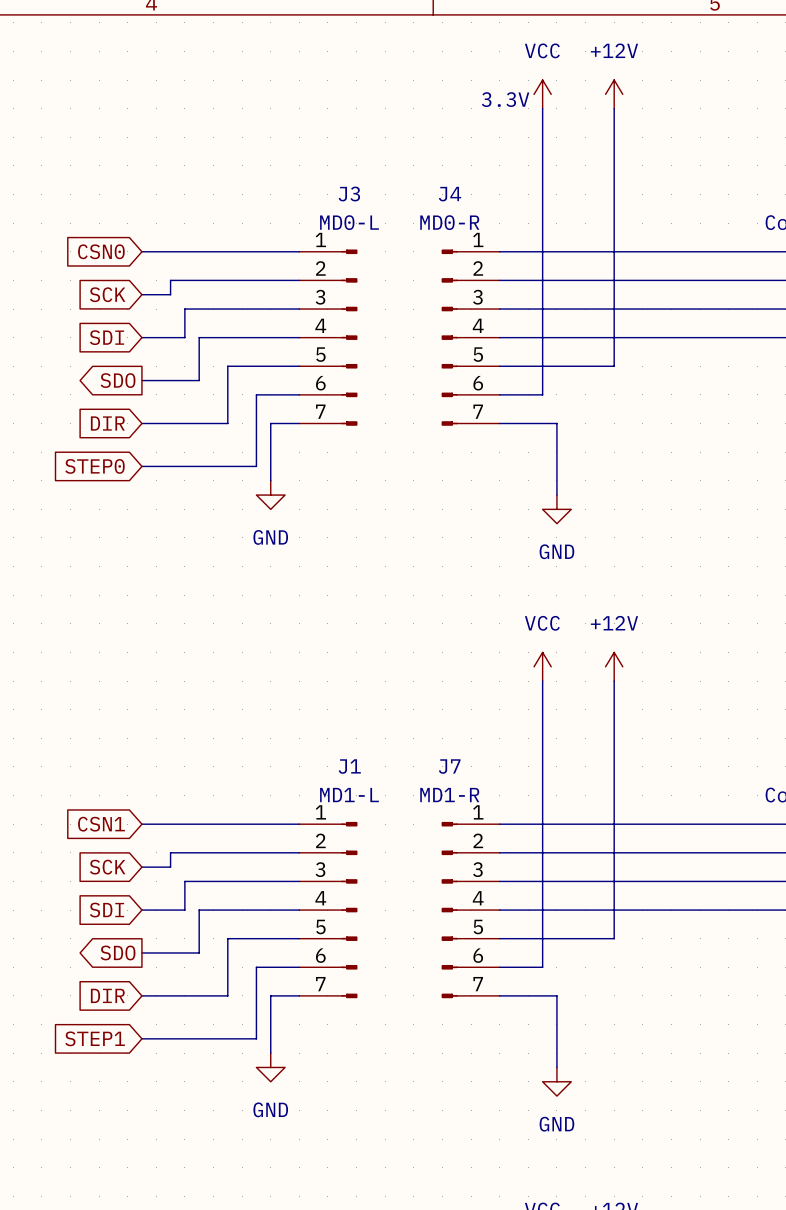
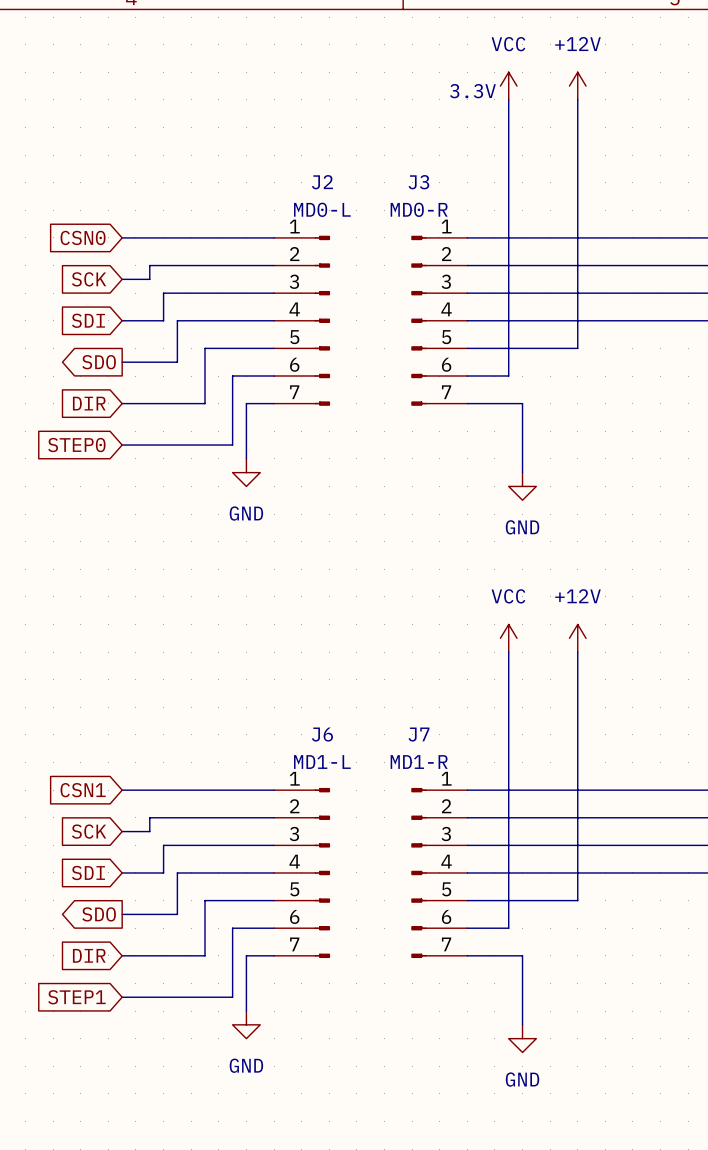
J3 name: J3 (349, 194) -> J2 (322, 182)
J4 name: J4 (449, 194) -> J3 (418, 182)
J1 name: J1 (349, 766) -> J6 (322, 734)

